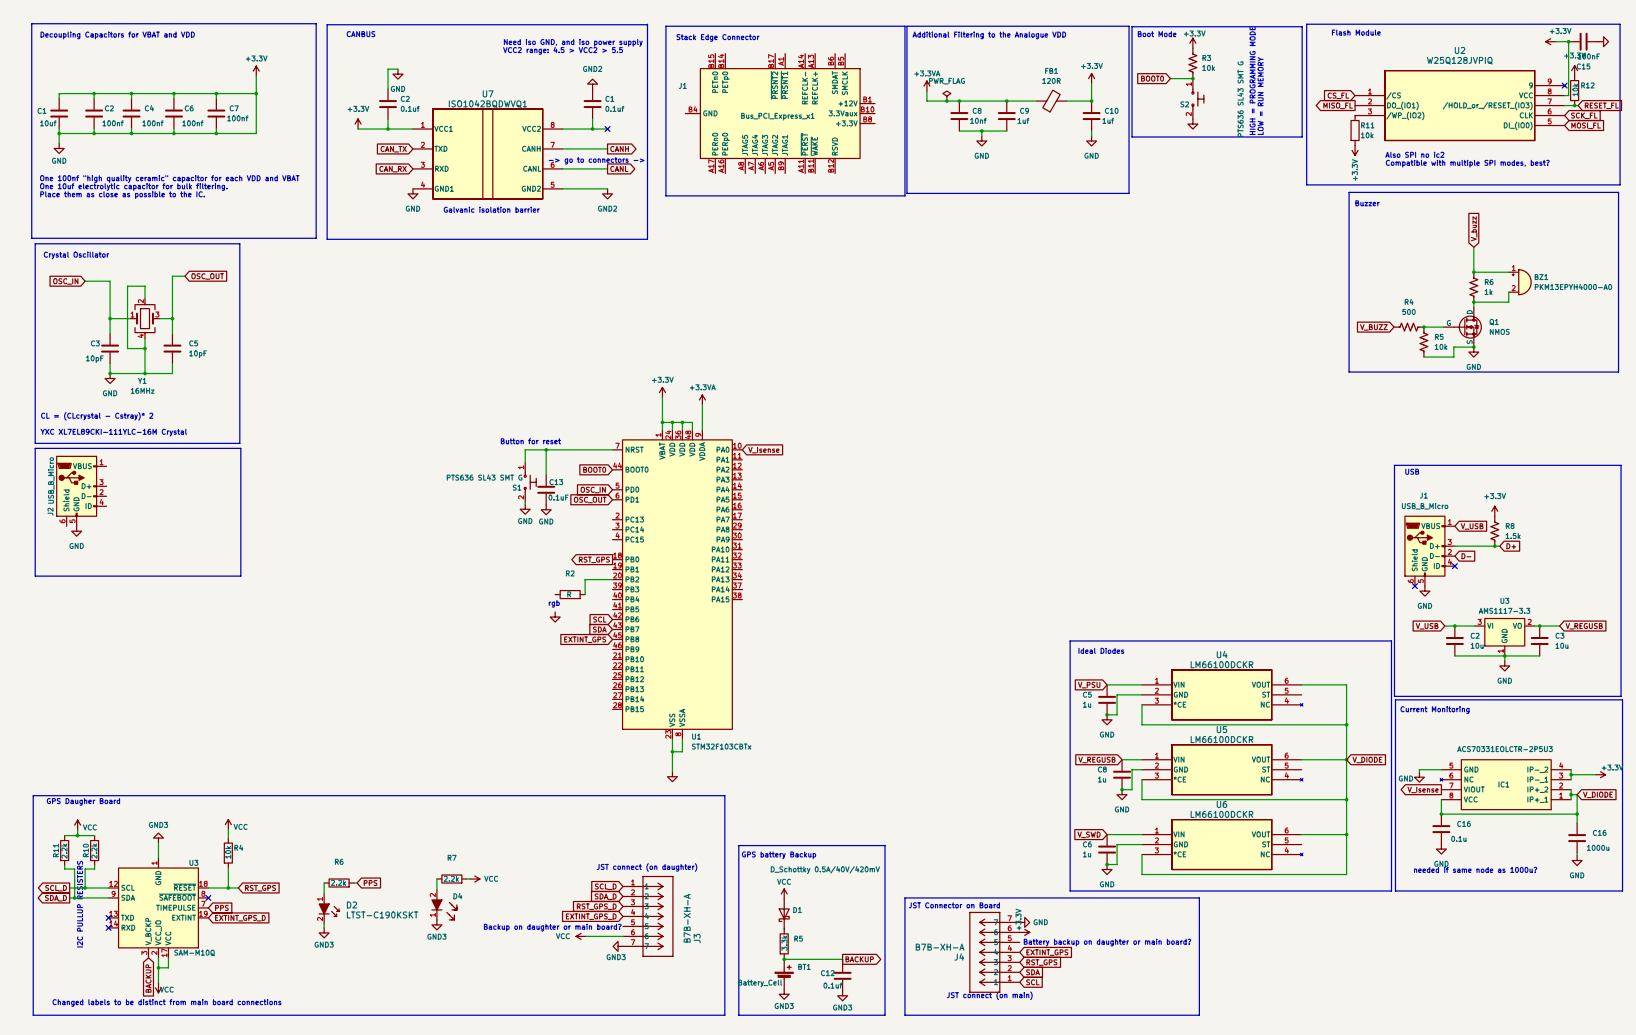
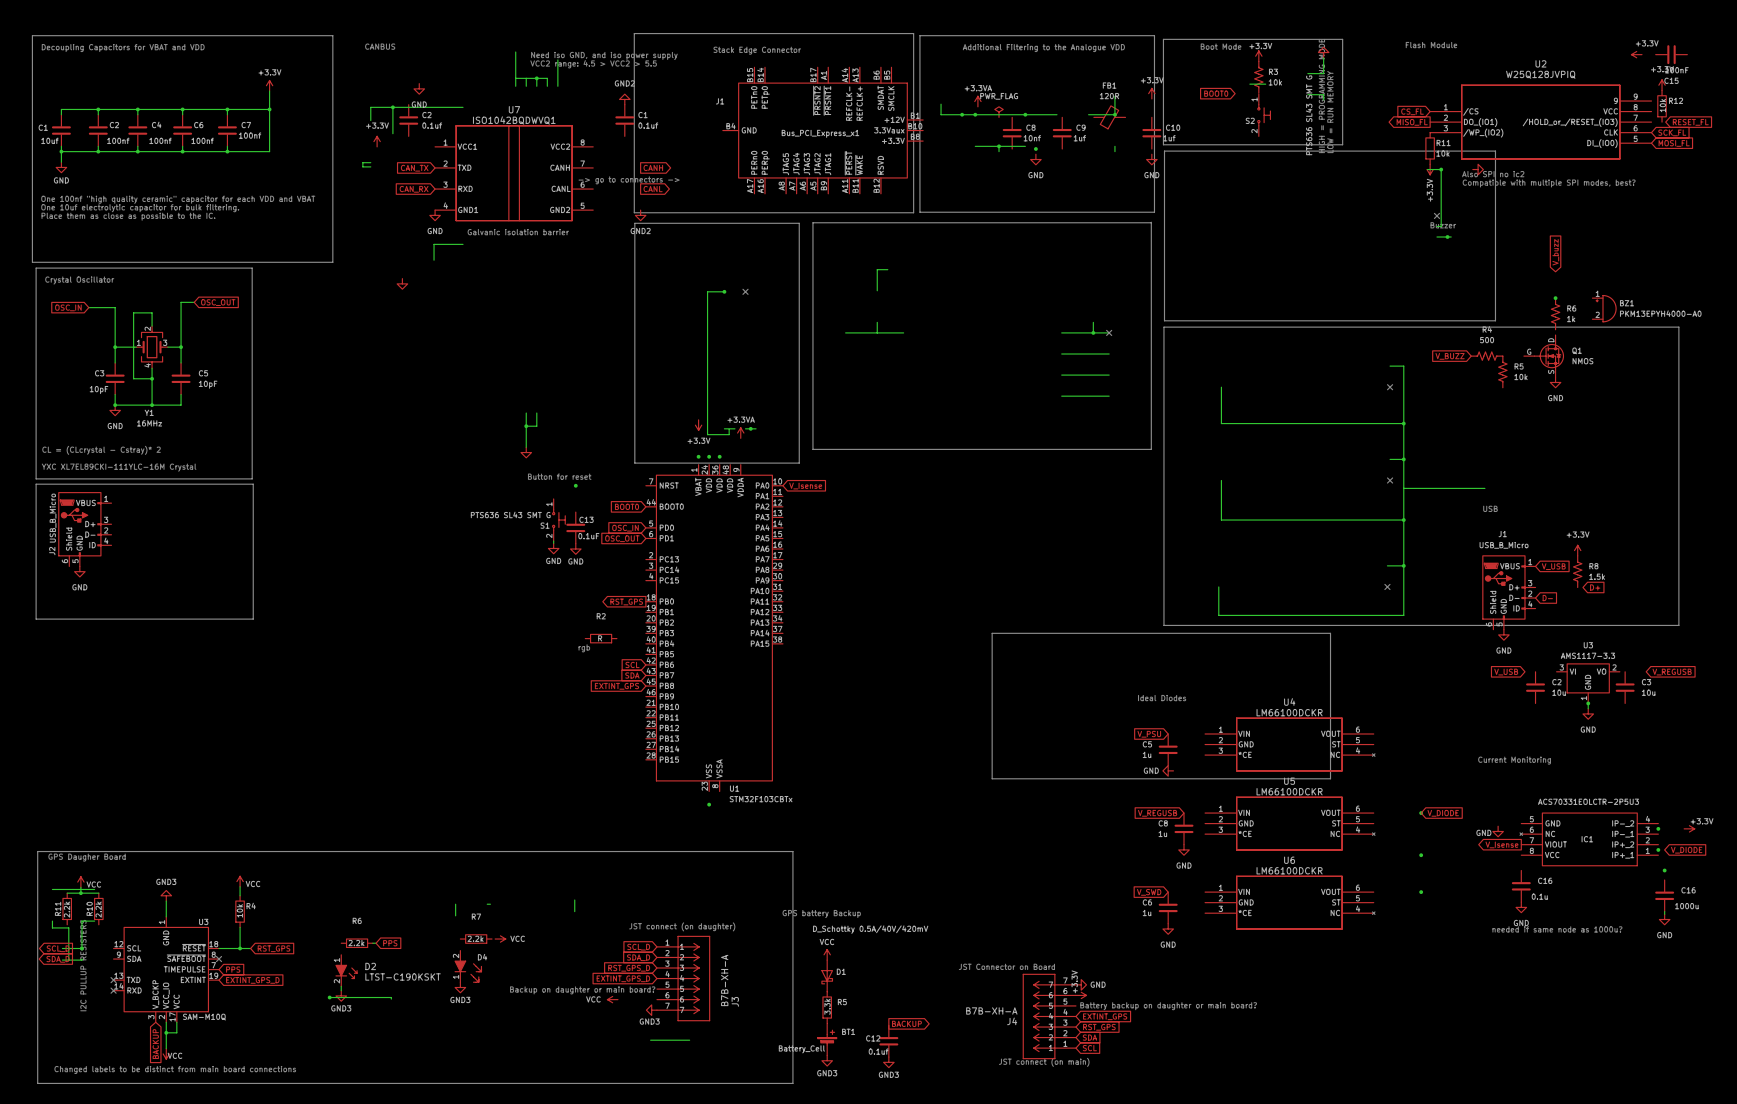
line: (647, 24) (647, 238) -> none
line: (647, 24) (327, 24) (327, 239) (647, 239) -> none
line: (1306, 24) (1620, 24) (1620, 184) (1306, 184) (1306, 24) -> none
line: (665, 26) (904, 26) (904, 195) (665, 195) (665, 26) -> (634, 33) (634, 212) (913, 212) (913, 33) (634, 33)
line: (906, 26) (1129, 26) (1129, 193) (906, 193) (906, 26) -> (919, 35) (1154, 35) (1154, 212) (919, 212) (919, 35)
line: (1132, 26) (1302, 26) (1302, 137) (1132, 137) (1132, 26) -> (1163, 39) (1163, 144) (1342, 144) (1342, 39) (1163, 39)
wire: none -> (515, 52) (515, 86)
power symbol: none -> (1323, 52)
wire: (1555, 41) (1568, 41) (1568, 95) (1564, 95) -> none
junction: (1568, 41) -> none
power symbol: (1603, 41) -> none
wire: none -> (1323, 57) (1323, 73) (1307, 73)
wire: none -> (557, 59) (557, 86)
wire: none -> (515, 78) (547, 78) (547, 86)
wire: none -> (526, 78) (526, 86)
wire: none -> (536, 78) (536, 86)
junction: none -> (536, 78)
wire: (397, 69) (388, 69) (388, 89) -> none
wire: none -> (1249, 84) (1265, 84)
wire: (1170, 78) (1192, 78) -> none
junction: (1192, 78) -> none
wire: none -> (1307, 94) (1323, 94) (1323, 99)
wire: (1091, 83) (1091, 101) (1066, 101) -> (1114, 96) (1114, 114) (1088, 114)
no-connect mark: (1564, 85) -> none
wire: none -> (392, 107) (392, 133)
junction: none -> (392, 107)
wire: none -> (463, 107) (370, 107) (370, 120)
wire: (926, 91) (926, 101) (1036, 101) -> (941, 104) (941, 114) (1056, 114)
junction: none -> (962, 114)
junction: none -> (975, 114)
junction: none -> (1025, 114)
junction: none -> (1114, 114)
junction: (946, 101) -> none
junction: (959, 101) -> none
junction: (1006, 101) -> none
junction: (1091, 101) -> none
wire: (1564, 105) (1578, 105) -> none
junction: (1574, 105) -> none
wire: (388, 119) (388, 129) -> none
wire: (592, 119) (592, 129) -> none
power symbol: (1192, 124) -> none
junction: none -> (999, 146)
wire: (358, 129) (412, 129) -> none
junction: (388, 129) -> none
wire: (562, 129) (607, 129) -> none
junction: (592, 129) -> none
no-connect mark: (607, 129) -> none
wire: (959, 131) (1006, 131) -> (975, 146) (1025, 146)
wire: (981, 131) (981, 136) -> (999, 146) (999, 151)
wire: (1091, 131) (1091, 136) -> (1114, 146) (1114, 151)
line: none -> (1164, 151) (1495, 151) (1495, 320) (1164, 320) (1164, 151)
wire: none -> (370, 162) (362, 162) (362, 166) (370, 166)
wire: (562, 148) (607, 148) -> none
wire: none -> (1427, 169) (1441, 169) (1441, 226) (1436, 226)
junction: none -> (1441, 169)
power symbol: none -> (1478, 169)
wire: (562, 168) (607, 168) -> none
wire: (562, 188) (607, 188) -> none
line: (1349, 192) (1618, 192) (1618, 372) (1349, 372) (1349, 192) -> none
no-connect mark: none -> (1436, 215)
line: none -> (1151, 222) (1151, 448)
line: none -> (1151, 222) (812, 222) (812, 449) (1151, 449)
line: none -> (634, 223) (799, 223) (799, 463) (634, 463) (634, 223)
wire: none -> (1436, 237) (1451, 237)
junction: none -> (1447, 237)
wire: none -> (463, 244) (434, 244) (434, 260)
wire: none -> (887, 269) (877, 269) (877, 290)
wire: (1473, 247) (1473, 272) (1508, 272) -> none
power symbol: none -> (402, 283)
wire: none -> (724, 291) (707, 291) (707, 434) (729, 434) (729, 429)
junction: none -> (724, 291)
no-connect mark: none -> (745, 291)
wire: (1508, 292) (1508, 302) (1473, 302) (1473, 307) -> none
wire: none -> (877, 322) (877, 332)
wire: none -> (1093, 322) (1093, 332)
line: none -> (1163, 327) (1678, 327) (1678, 625) (1163, 625) (1163, 327)
junction: (1473, 302) -> none
wire: none -> (845, 332) (903, 332)
wire: none -> (1061, 332) (1109, 332)
junction: none -> (1093, 332)
no-connect mark: none -> (1109, 332)
wire: none -> (1061, 354) (1109, 354)
wire: (1423, 327) (1443, 327) -> none
junction: (1423, 327) -> none
wire: none -> (1390, 366) (1403, 366) (1403, 615) (1218, 615) (1218, 586)
wire: none -> (1061, 375) (1109, 375)
wire: (1473, 347) (1453, 347) (1453, 357) (1423, 357) -> none
junction: (1473, 347) -> none
wire: none -> (1221, 387) (1221, 423) (1403, 423)
no-connect mark: none -> (1390, 387)
wire: none -> (1061, 396) (1109, 396)
wire: none -> (526, 413) (526, 447)
wire: none -> (536, 413) (536, 426) (526, 426)
junction: none -> (1403, 423)
power symbol rotation: 0° (662, 392) -> 180° (698, 425)
junction: none -> (526, 426)
wire: none -> (724, 428) (734, 428)
wire: none -> (745, 428) (756, 428)
junction: none -> (750, 428)
wire: (662, 397) (662, 429) -> none
wire: (702, 404) (702, 429) -> none
power symbol: none -> (526, 452)
wire: (662, 422) (692, 422) (692, 429) -> none
wire: none -> (1390, 459) (1403, 459)
junction: none -> (1403, 459)
wire: none -> (1221, 480) (1221, 520) (1403, 520)
no-connect mark: none -> (1390, 480)
wire: (546, 449) (546, 474) -> none
wire: (612, 449) (525, 449) (525, 462) -> none
wire: none -> (1403, 488) (1484, 488)
line: (1394, 465) (1621, 465) (1621, 696) (1394, 696) (1394, 465) -> none
junction: none -> (1403, 520)
wire: none -> (1387, 565) (1403, 565)
junction: none -> (1403, 565)
no-connect mark: none -> (1387, 586)
wire: (1454, 546) (1499, 546) -> none
junction: (1494, 546) -> none
no-connect mark: (1454, 566) -> none
wire: (612, 579) (585, 579) (585, 594) -> none
no-connect mark: (1414, 586) -> none
line: none -> (992, 633) (1330, 633) (1330, 778) (992, 778) (992, 633)
power symbol: (555, 617) -> none
wire: (1444, 626) (1474, 626) -> none
junction: (1454, 626) -> none
wire: (1534, 626) (1559, 626) -> none
junction: (1539, 626) -> none
line: (1070, 640) (1391, 640) (1391, 890) (1070, 890) (1070, 640) -> none
wire: (1454, 655) (1539, 655) -> none
wire: (1107, 684) (1141, 684) -> none
wire: (1301, 684) (1346, 684) (1346, 874) (1141, 874) (1141, 854) -> none
wire: (1141, 694) (1117, 694) (1117, 714) (1107, 714) -> none
line: (1395, 699) (1622, 699) (1622, 890) (1395, 890) (1395, 699) -> none
wire: (1141, 704) (1141, 724) (1346, 724) -> none
junction: (1107, 714) -> none
power symbol rotation: 0° (1107, 719) -> 90° clockwise (1168, 770)
junction: (1346, 724) -> none
wire: (672, 739) (672, 771) -> none
wire: (682, 739) (682, 751) (672, 751) -> none
wire: (1122, 759) (1141, 759) -> none
wire: (1301, 759) (1346, 759) -> none
wire: (1141, 769) (1132, 769) (1132, 789) (1122, 789) -> none
wire: (1441, 769) (1419, 769) (1419, 772) -> none
wire: (1571, 769) (1571, 779) -> none
wire: (1571, 774) (1595, 774) -> none
power symbol: (672, 776) -> none
wire: (1141, 779) (1141, 799) (1346, 799) -> none
junction: (1122, 789) -> none
wire: (1571, 789) (1571, 799) -> none
wire: (1571, 794) (1577, 794) (1577, 823) -> none
line: (33, 795) (724, 795) (724, 1015) (33, 1015) (33, 795) -> (37, 851) (37, 1083) (792, 1083) (792, 851) (37, 851)
wire: (1441, 799) (1441, 814) (1577, 814) -> none
junction: (1441, 814) -> none
wire: none -> (52, 889) (94, 889)
wire: (1107, 834) (1141, 834) -> none
wire: (1301, 834) (1346, 834) -> none
wire: none -> (574, 900) (574, 911)
wire: (1141, 844) (1117, 844) (1117, 864) (1107, 864) -> none
line: (738, 845) (885, 845) (885, 1015) (738, 1015) (738, 845) -> none
wire: none -> (52, 921) (52, 927) (68, 927) (68, 960)
junction: (1107, 864) -> none
wire: (64, 865) (64, 869) (74, 869) (74, 897) -> none
wire: (94, 865) (94, 869) (85, 869) (85, 887) -> none
wire: (436, 879) (436, 889) -> (455, 904) (455, 915)
wire: (466, 879) (469, 879) -> (487, 904) (490, 904)
wire: (324, 883) (324, 893) -> none
wire: none -> (62, 948) (72, 948)
wire: (78, 887) (108, 887) -> (81, 948) (81, 921) (94, 921)
junction: none -> (81, 948)
junction: (85, 887) -> none
wire: (69, 897) (108, 897) -> none
junction: (74, 897) -> none
wire: none -> (81, 959) (62, 960)
line: (904, 897) (1199, 897) (1199, 1015) (904, 1015) (904, 897) -> none
wire: none -> (329, 996) (391, 997) (391, 999)
junction: none -> (329, 997)
wire: (586, 936) (623, 936) -> (650, 1040) (689, 1040)
wire: (784, 958) (842, 960) -> none
junction: (784, 959) -> none

